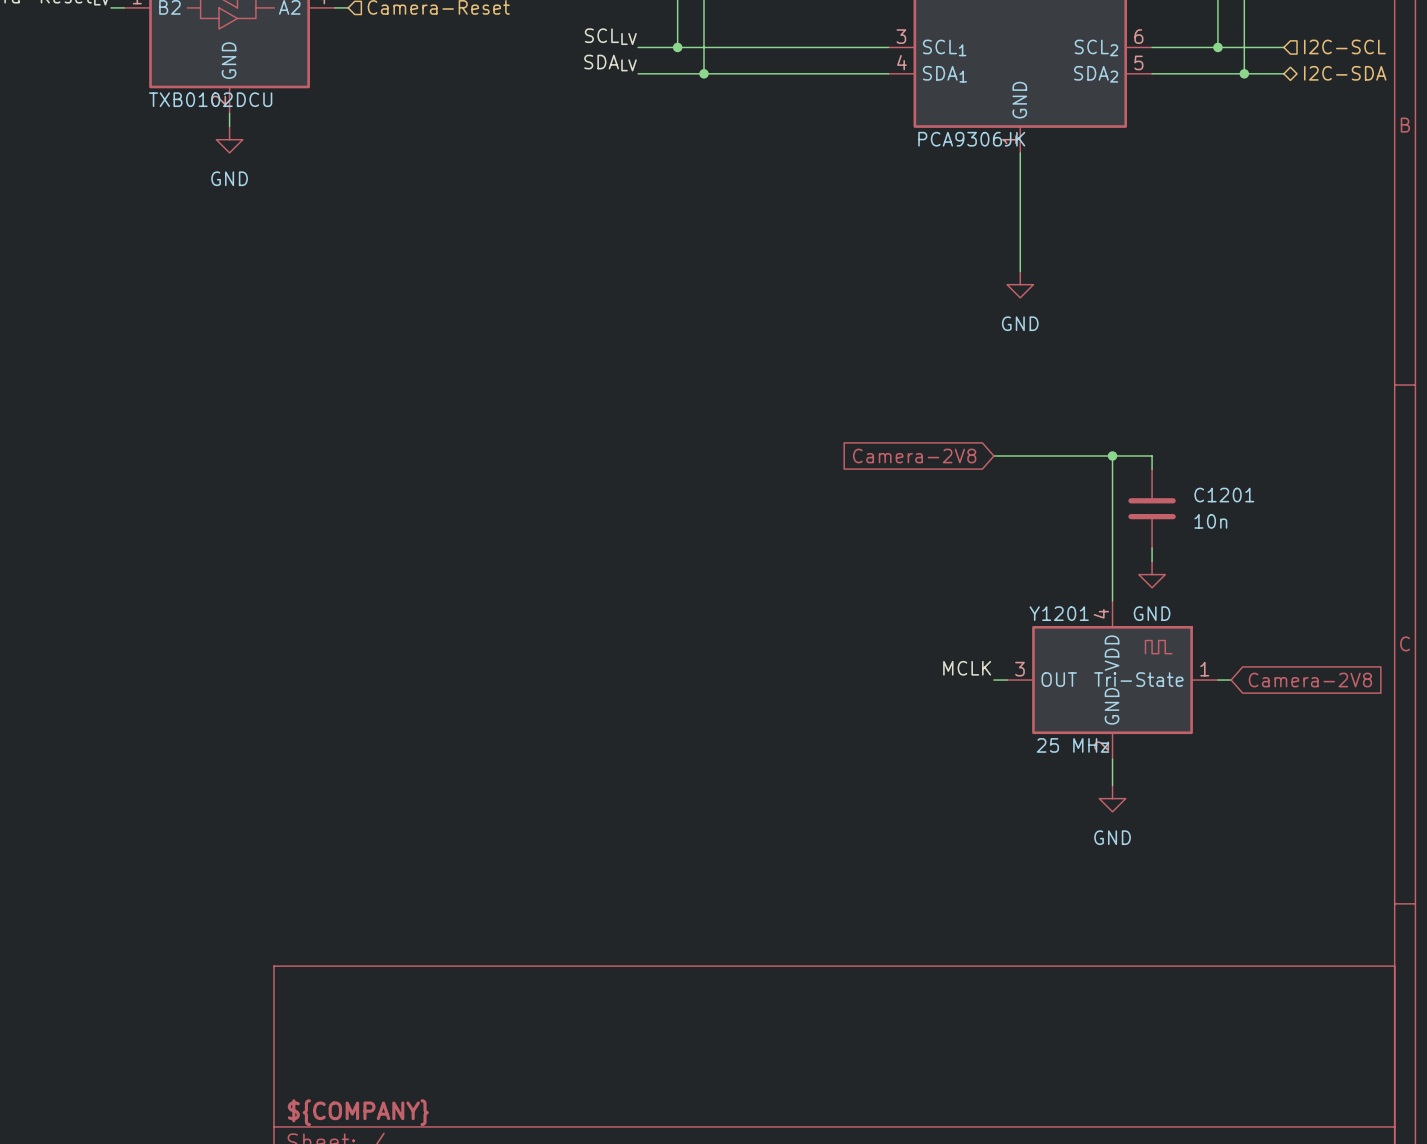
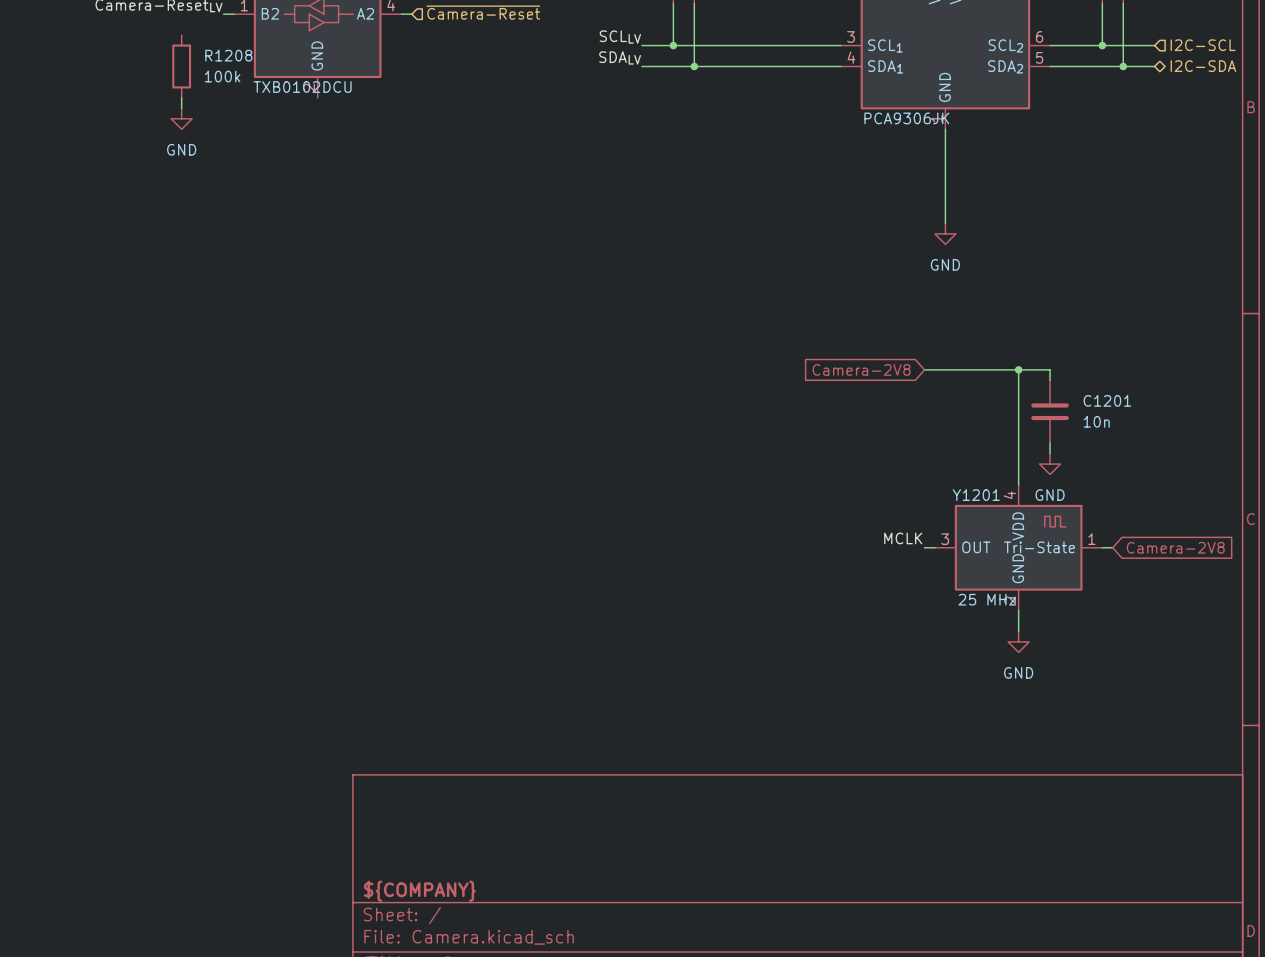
R1208: none -> 100k (181, 66)
wire: (229, 113) (229, 126) -> (181, 97) (181, 108)
power symbol position: GND (229, 139) -> GND (181, 118)

